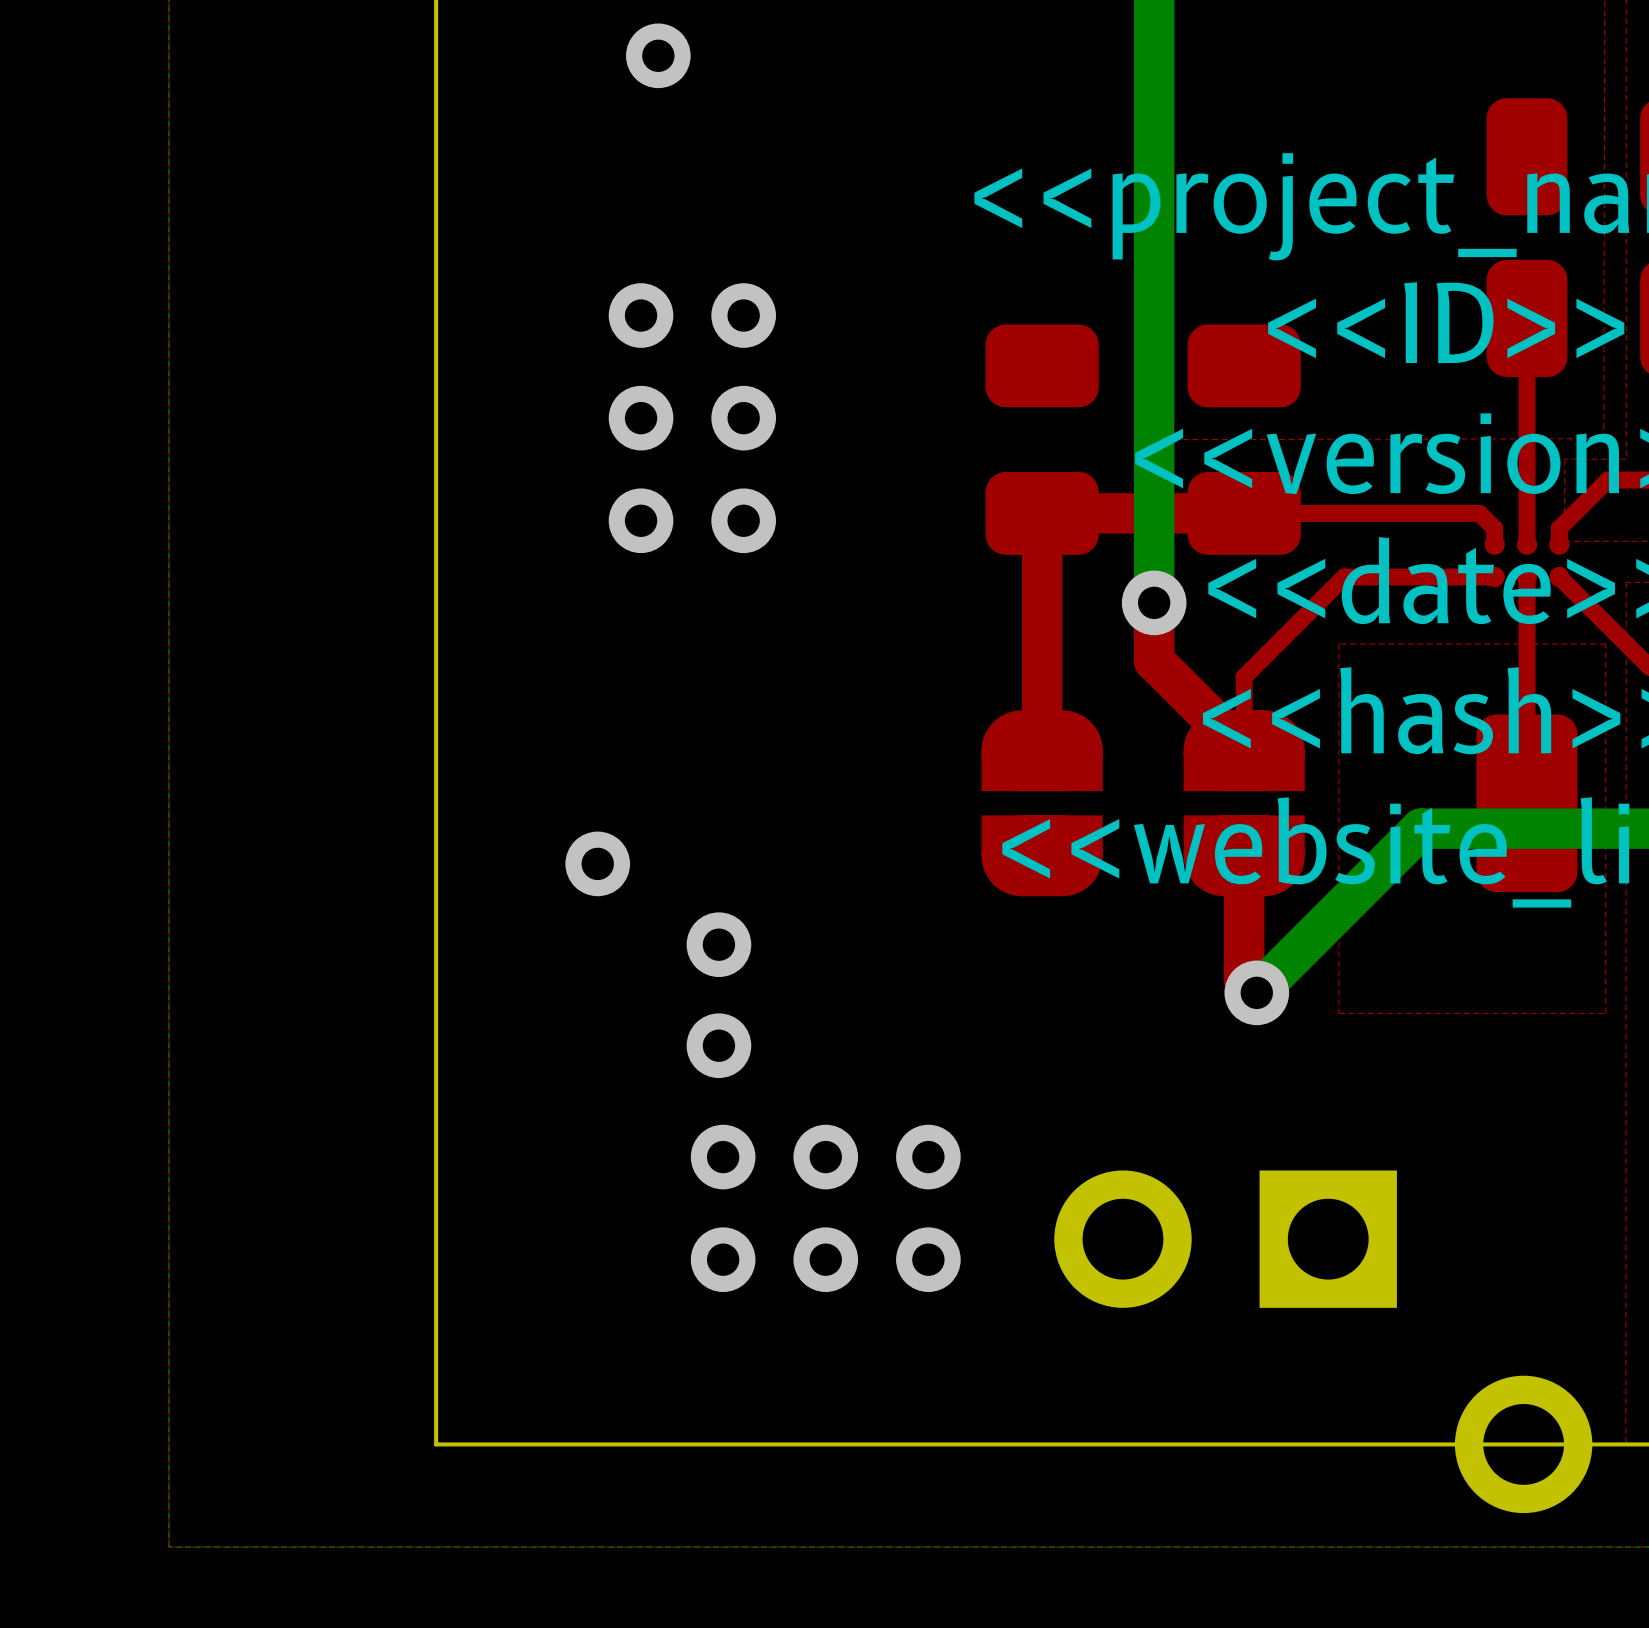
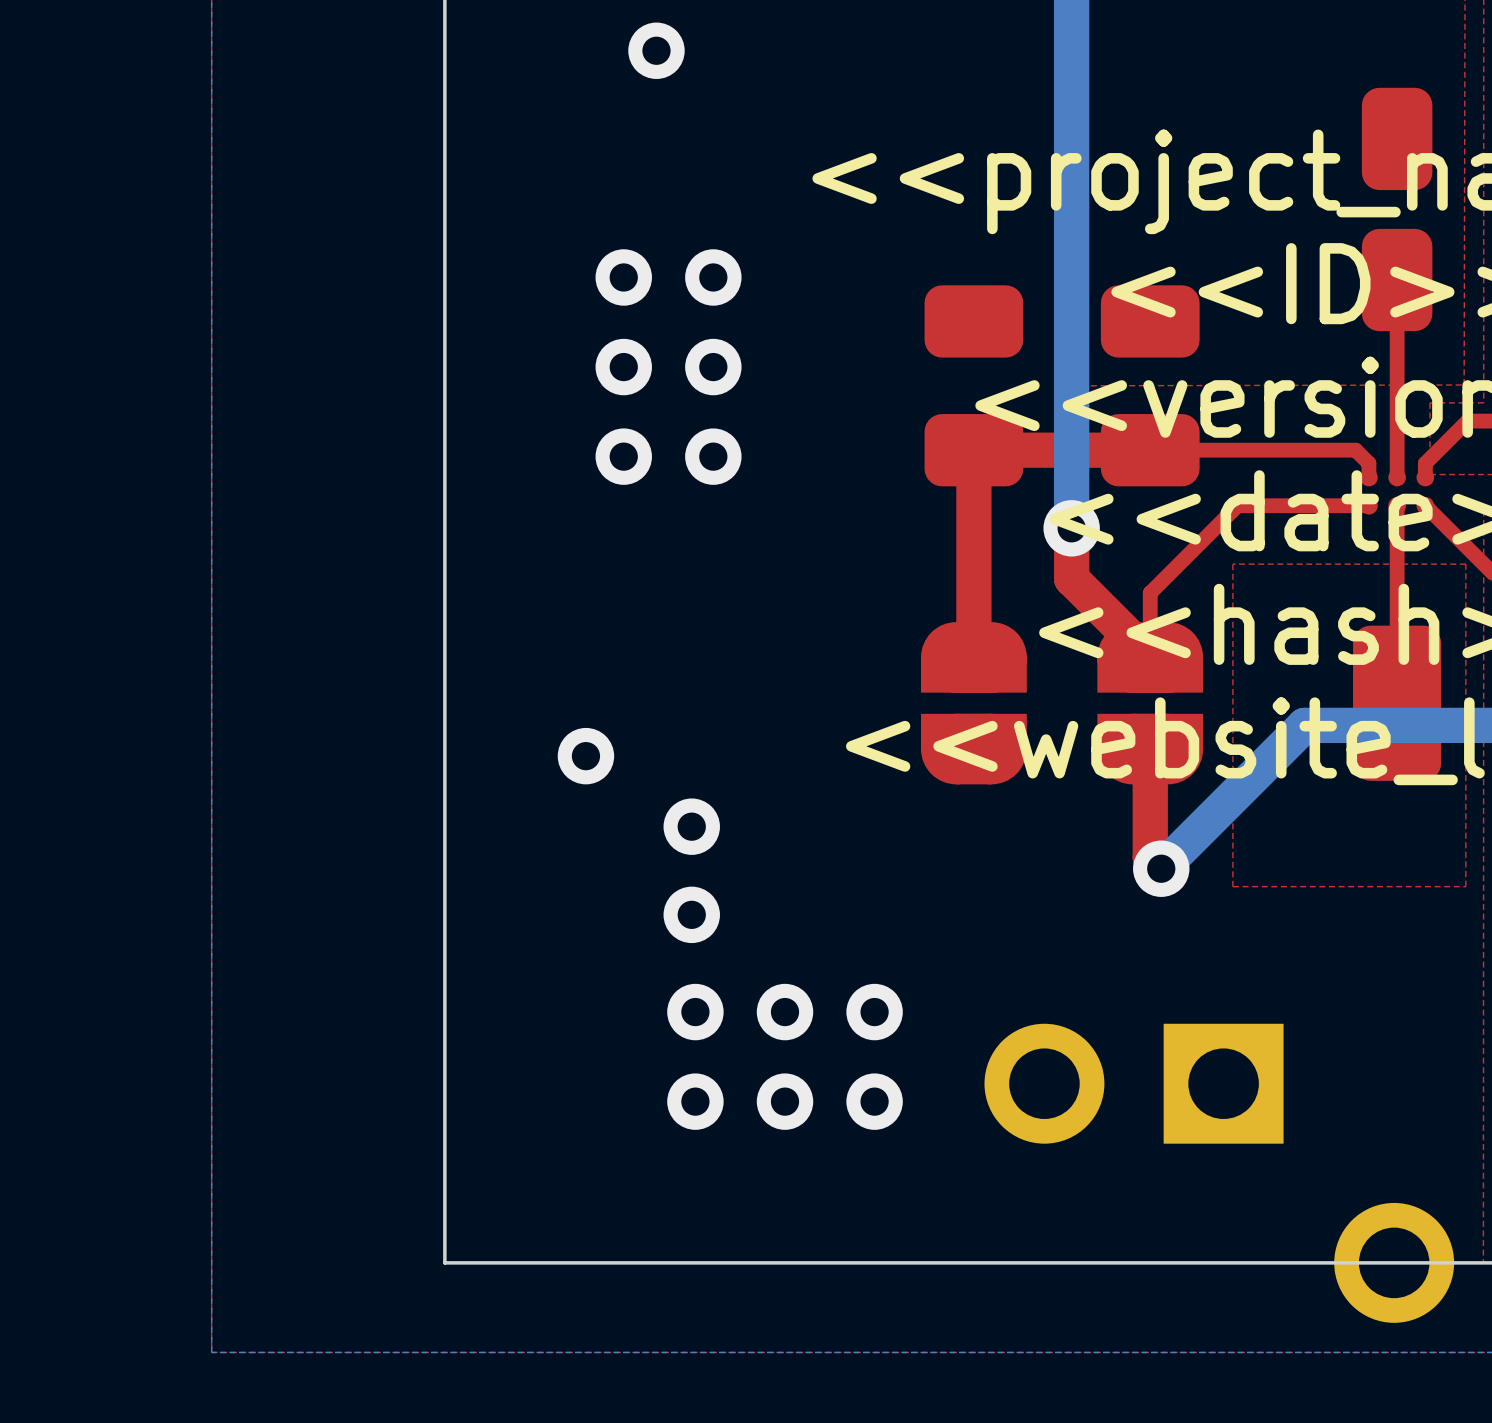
via position: (658, 55) -> (656, 50)

